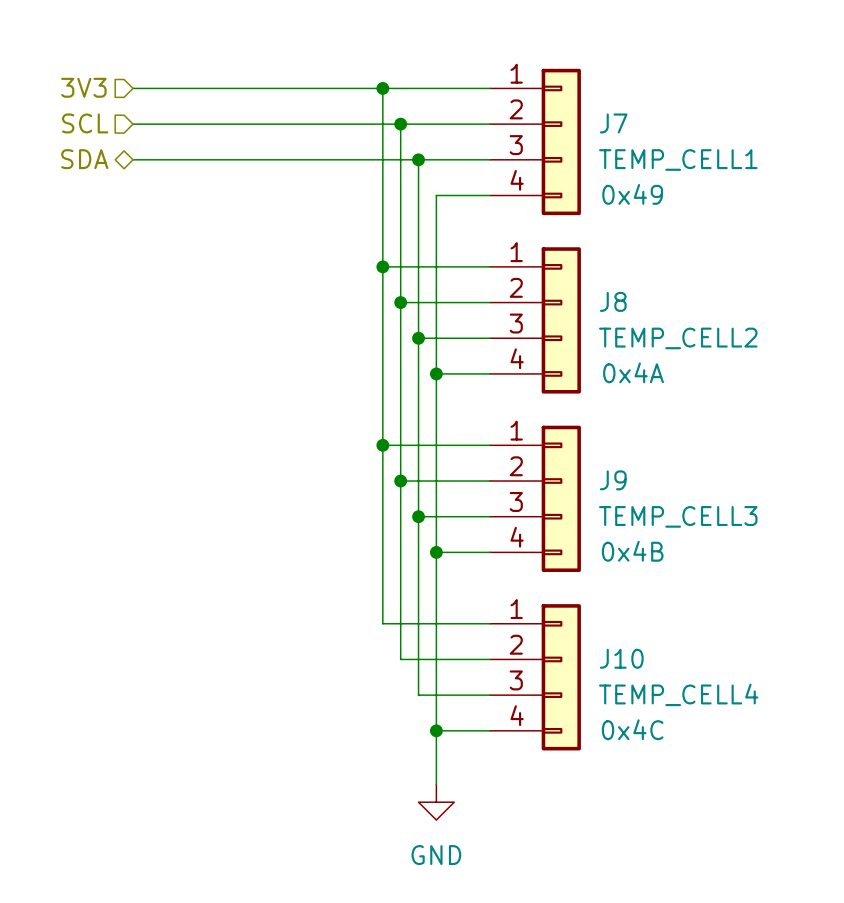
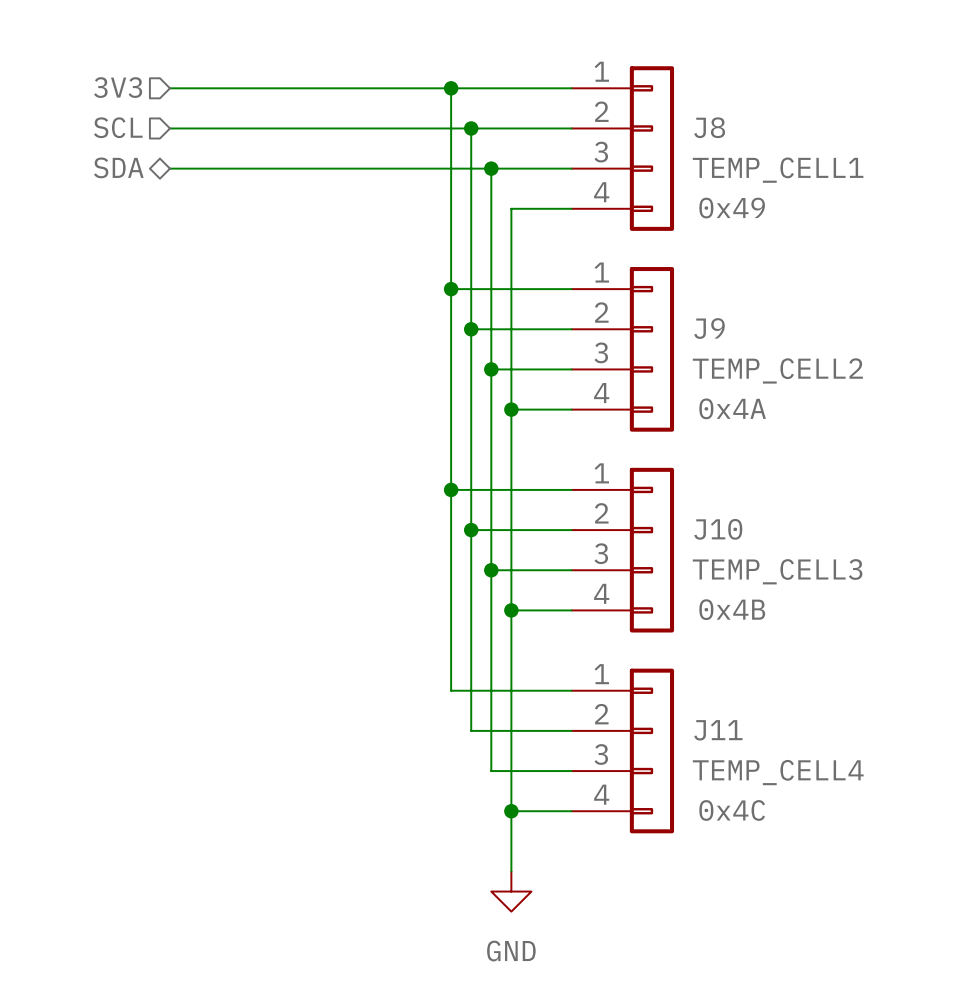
J7 name: J7 (613, 123) -> J8 (709, 127)
J8 name: J8 (613, 301) -> J9 (709, 328)
J9 name: J9 (613, 480) -> J10 (718, 529)
J10 name: J10 (621, 658) -> J11 (718, 730)

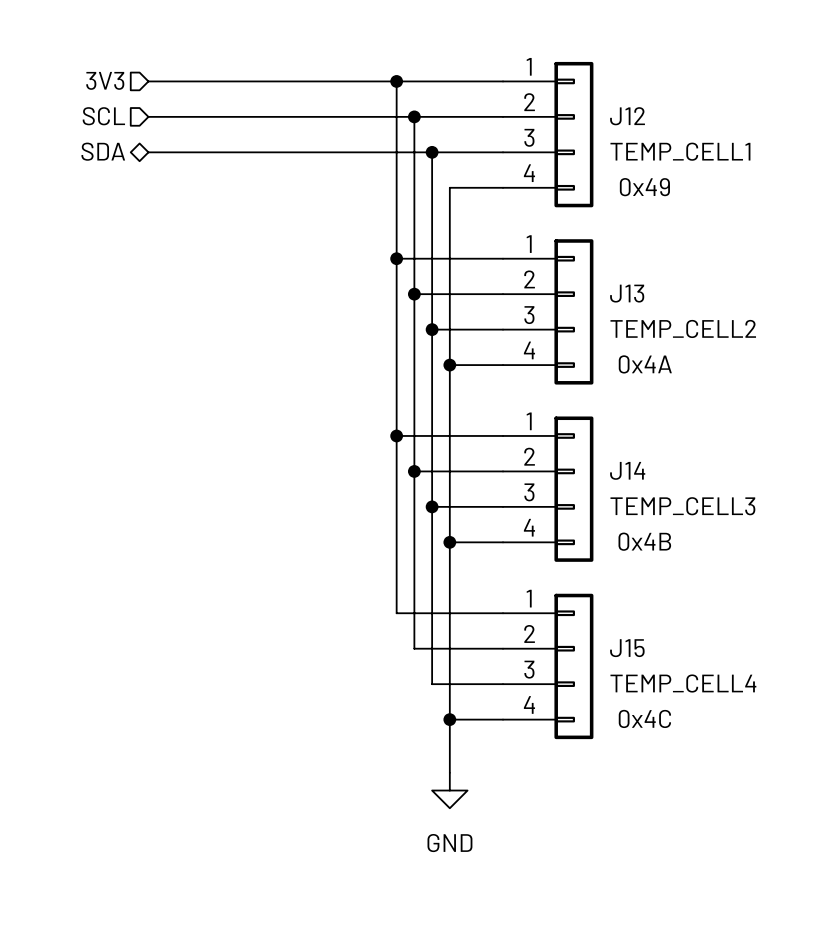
J8 name: J8 (709, 127) -> J12 (627, 116)
J9 name: J9 (709, 328) -> J13 (627, 293)
J10 name: J10 (718, 529) -> J14 (627, 470)
J11 name: J11 (718, 730) -> J15 (627, 648)

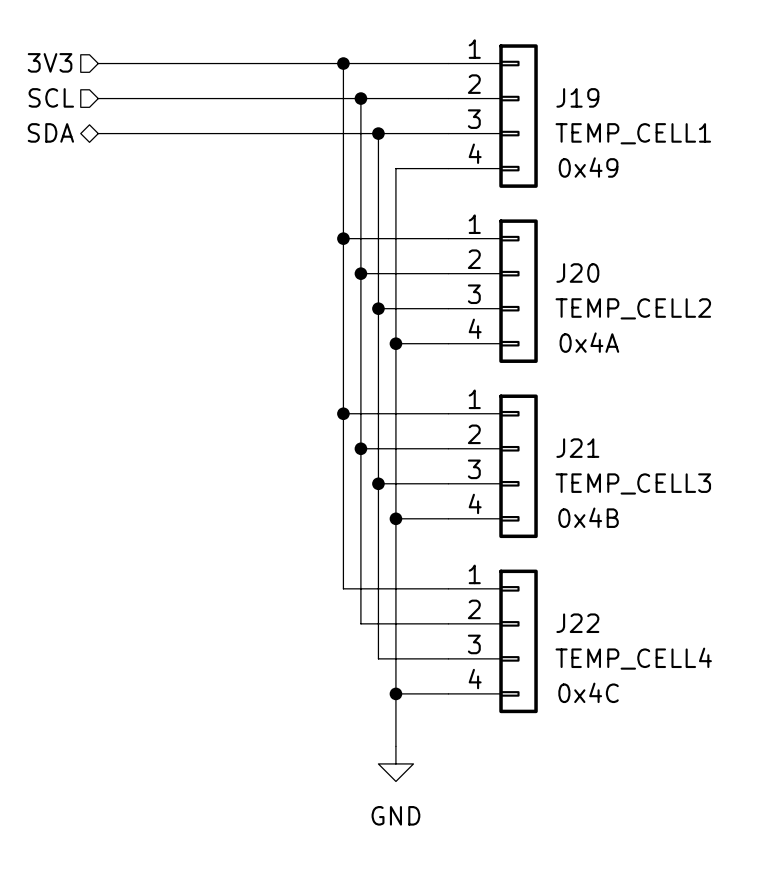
J12 name: J12 (627, 116) -> J19 (577, 97)
J13 name: J13 (627, 293) -> J20 (577, 273)
J14 name: J14 (627, 470) -> J21 (577, 448)
J15 name: J15 (627, 648) -> J22 (577, 623)

